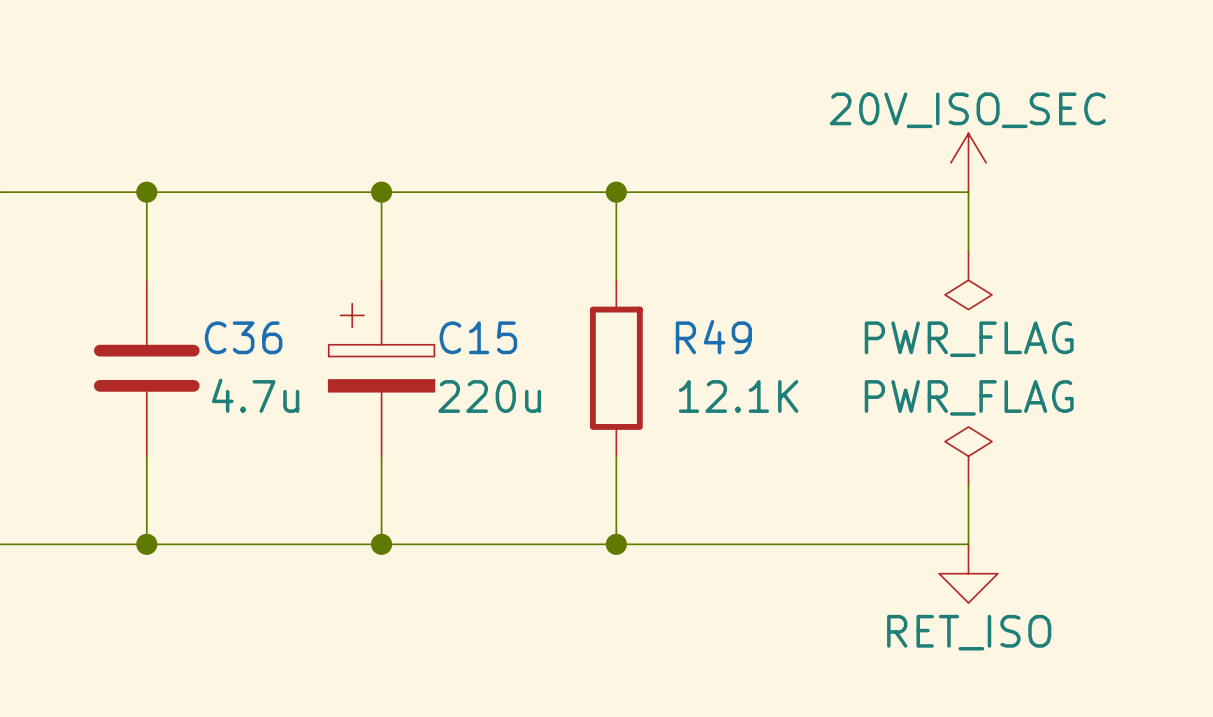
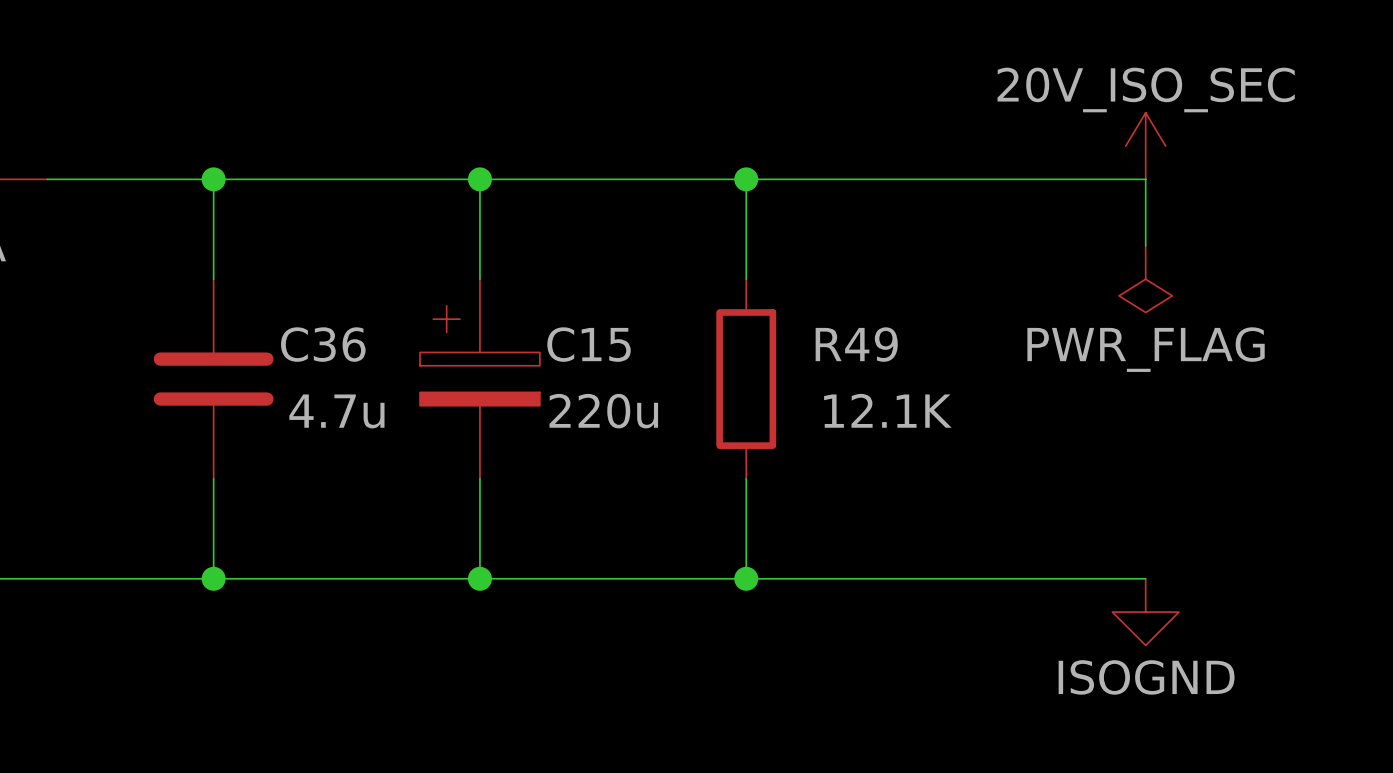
power symbol: PWR_FLAG (968, 456) -> none
wire: (968, 485) (968, 544) -> none
power symbol: RET_ISO (968, 573) -> ISOGND (1145, 612)

